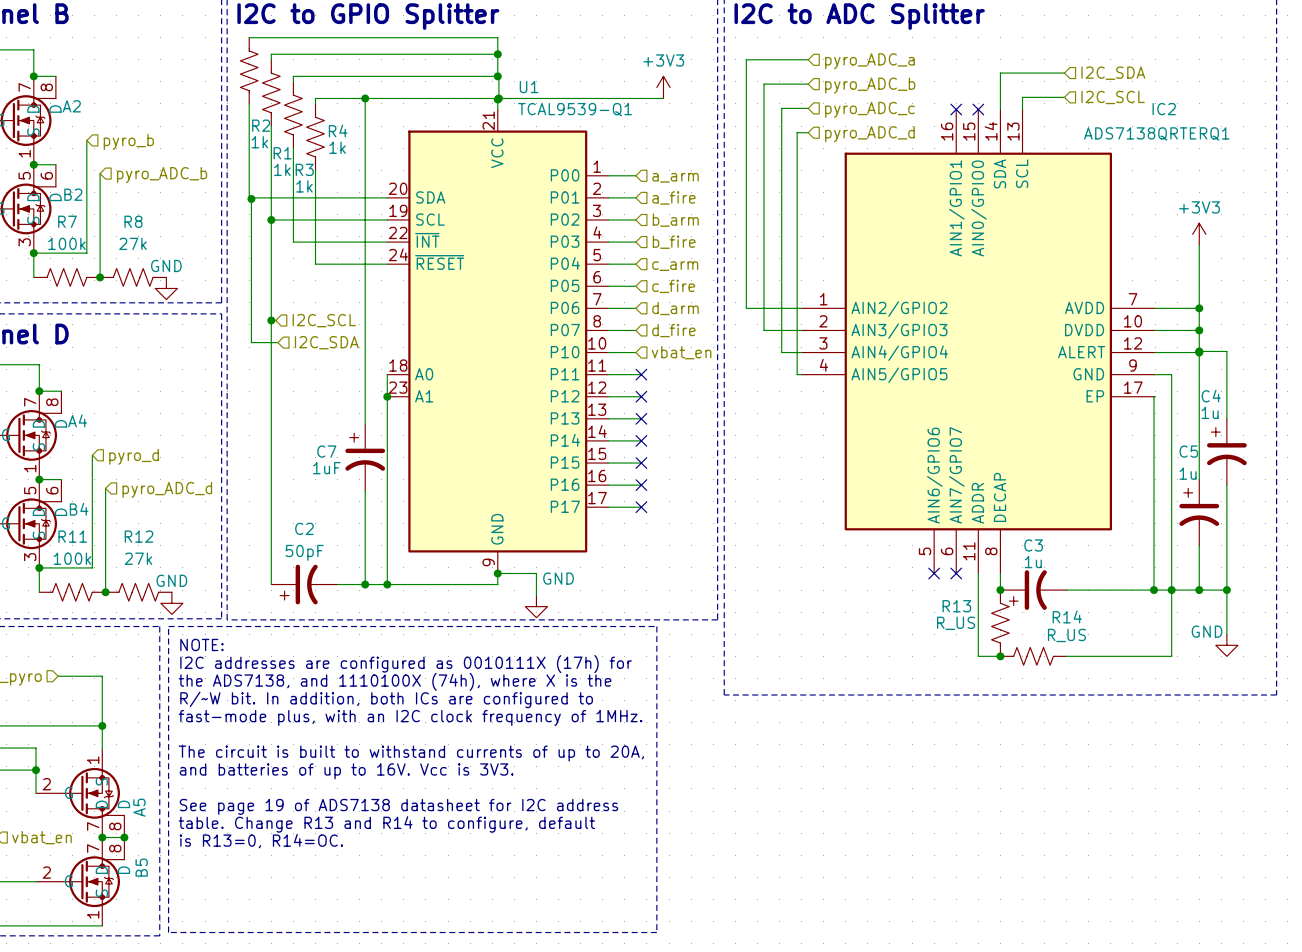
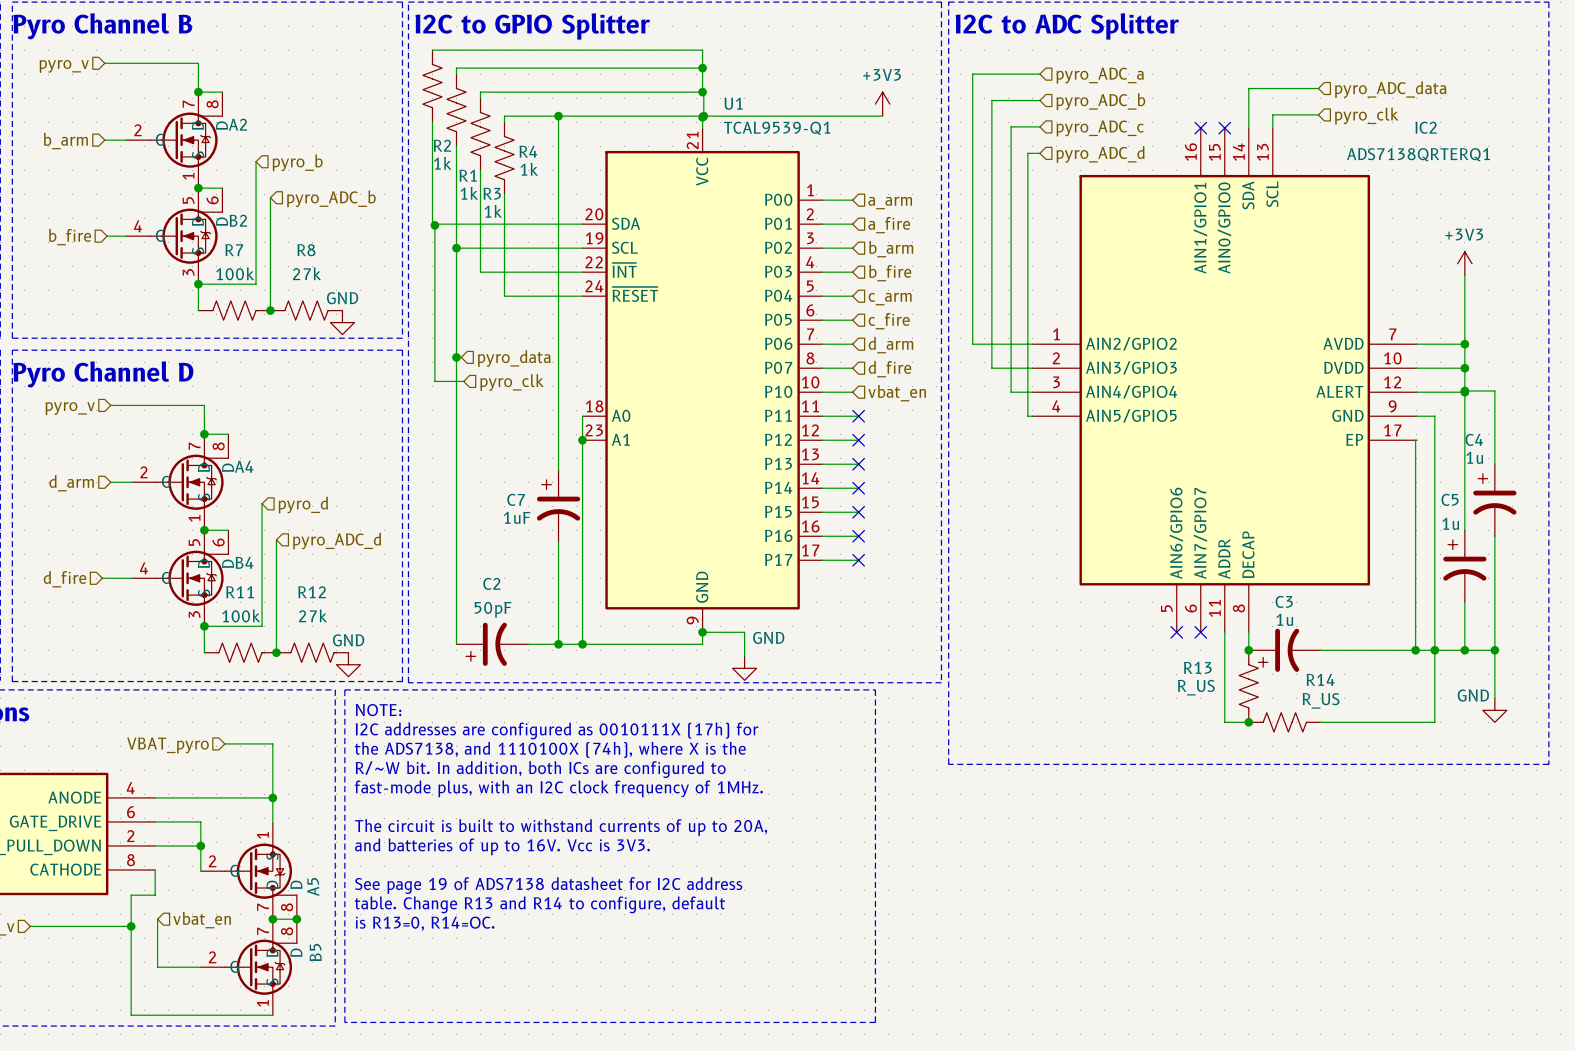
hierarchical label: I2C_SDA (1113, 73) -> pyro_ADC_data (1390, 89)
hierarchical label: I2C_SCL (1113, 97) -> pyro_clk (1366, 116)
hierarchical label: I2C_SCL (324, 320) -> pyro_data (514, 358)
hierarchical label: I2C_SDA (326, 342) -> pyro_clk (512, 382)

